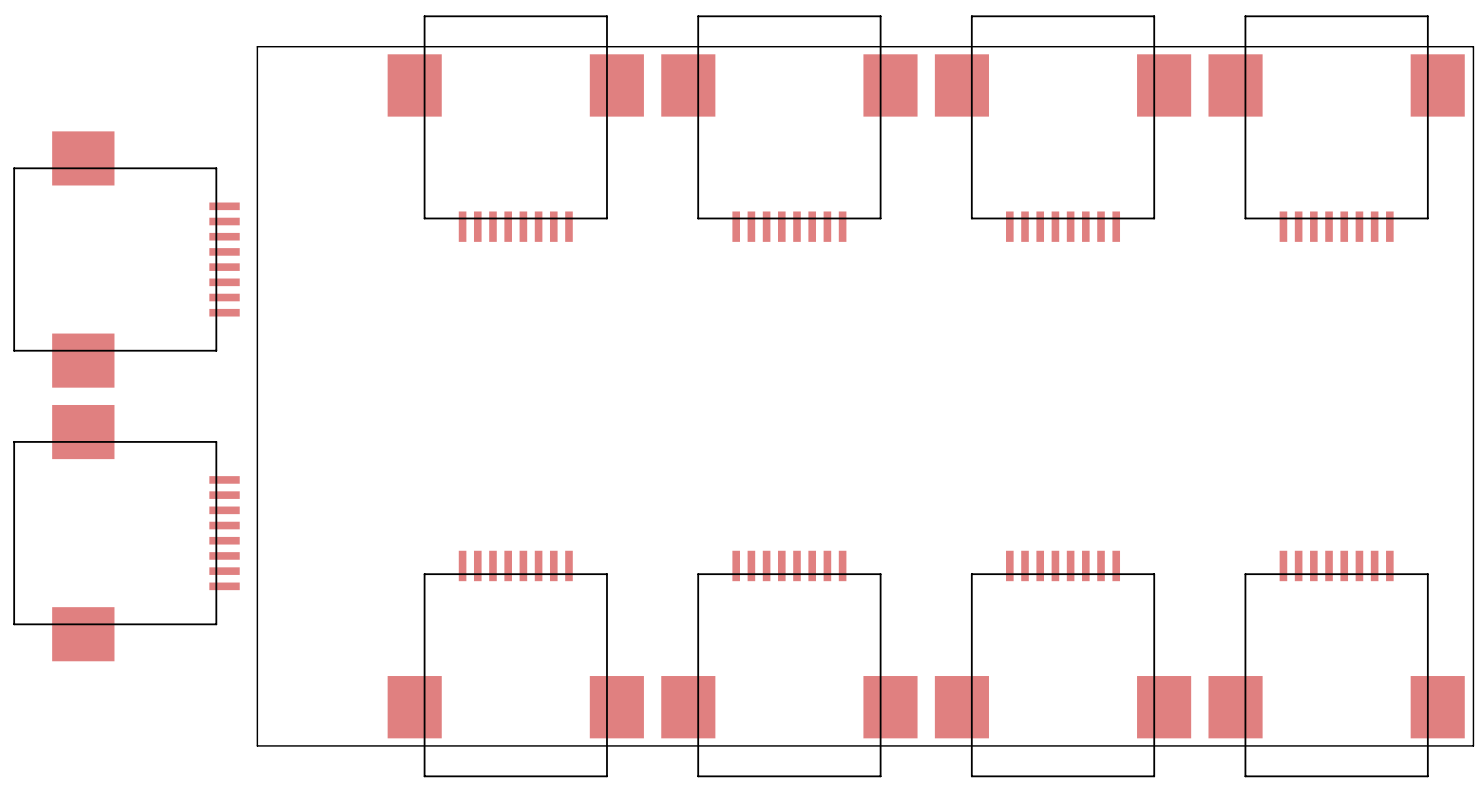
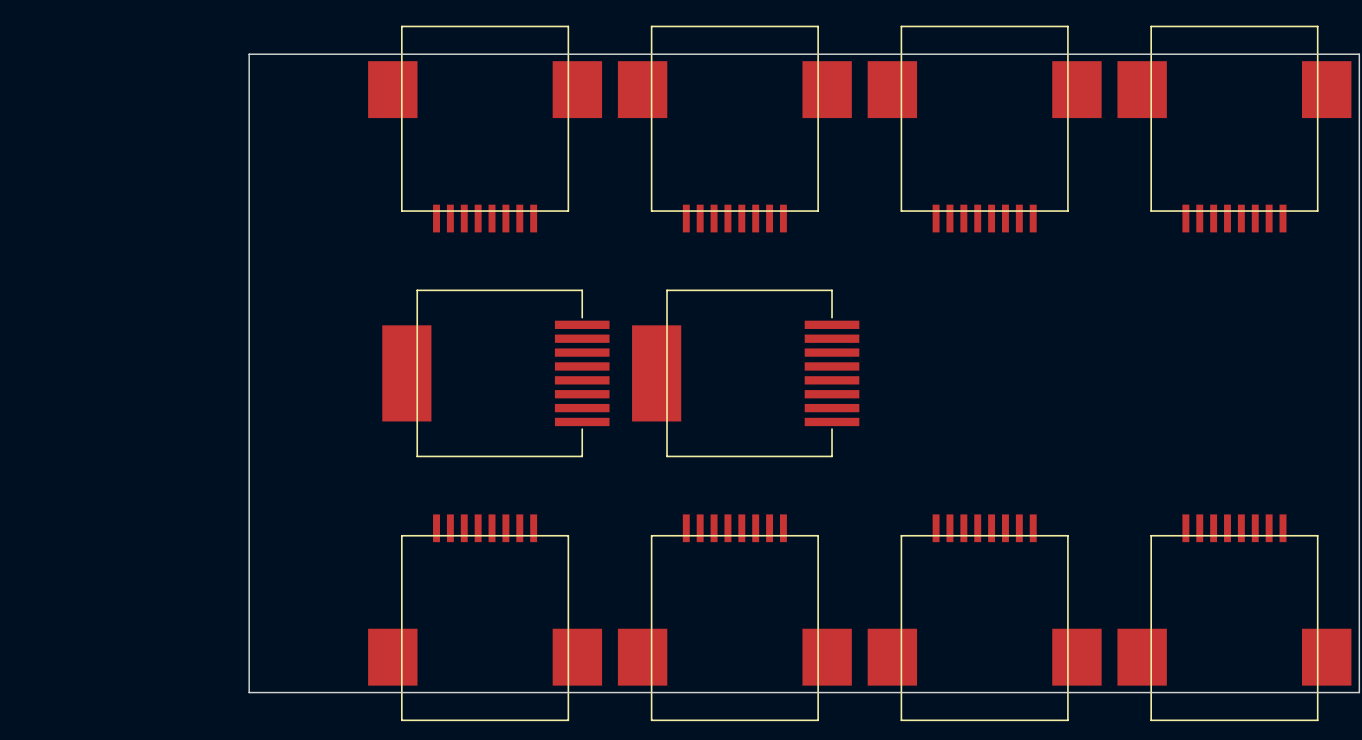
part: (126, 259) -> none
part: none -> (495, 373)
part: none -> (745, 373)
part: (126, 533) -> none

